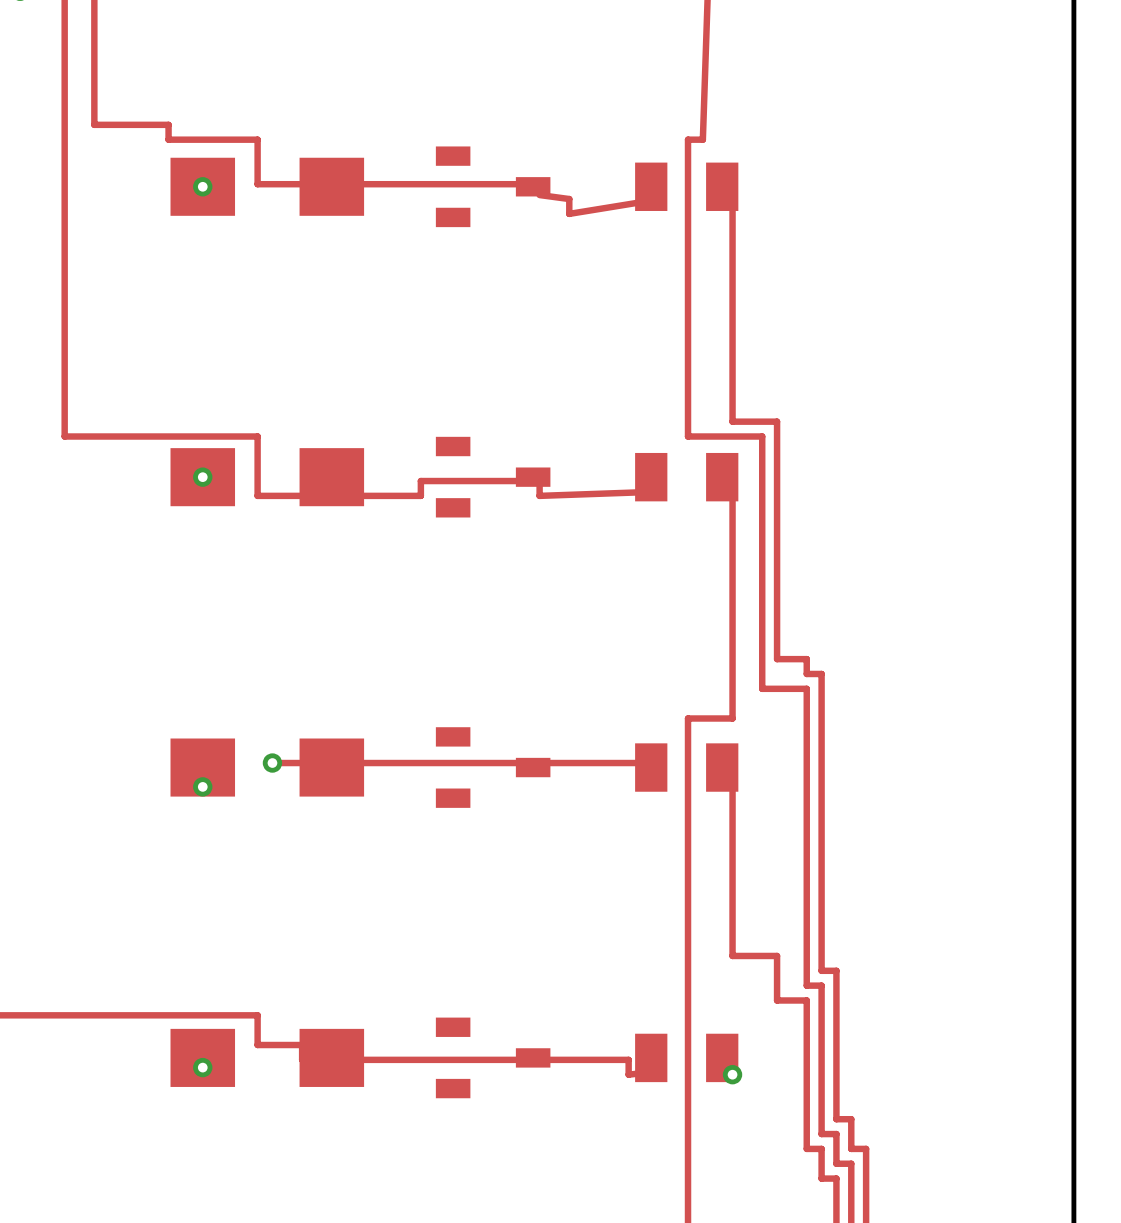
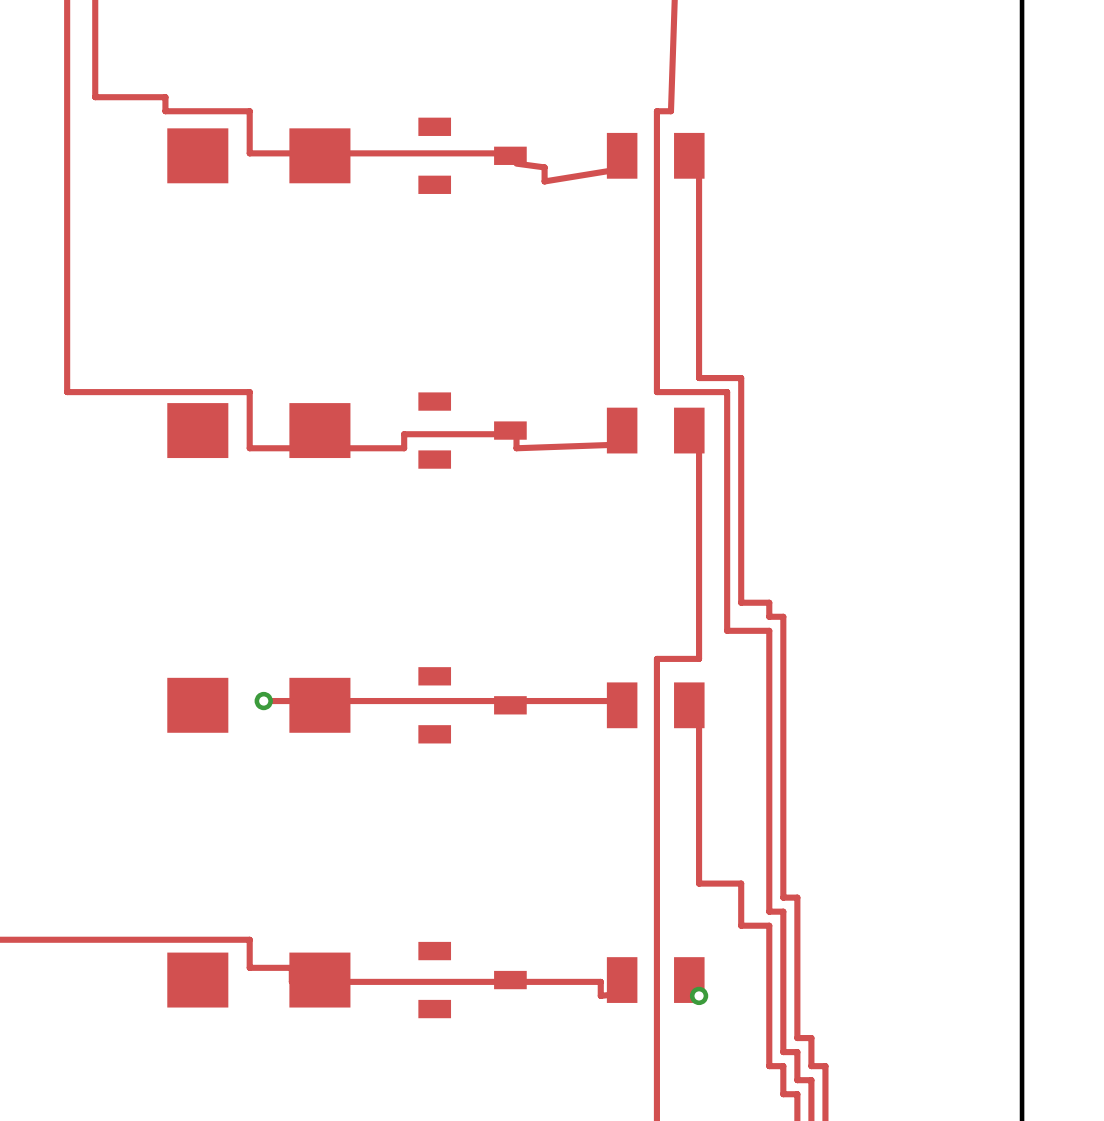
via: (202, 186) -> none
via: (202, 477) -> none
via: (202, 786) -> none
via: (202, 1067) -> none

